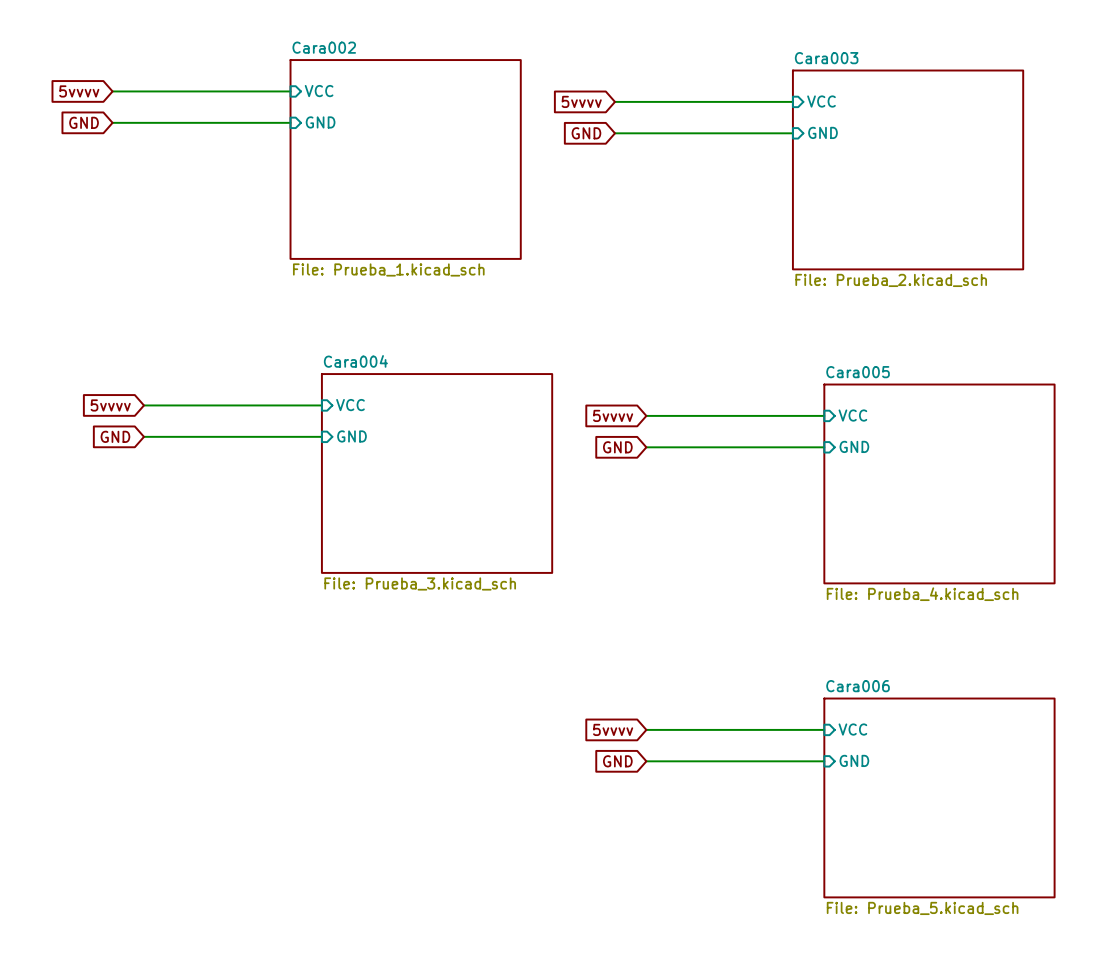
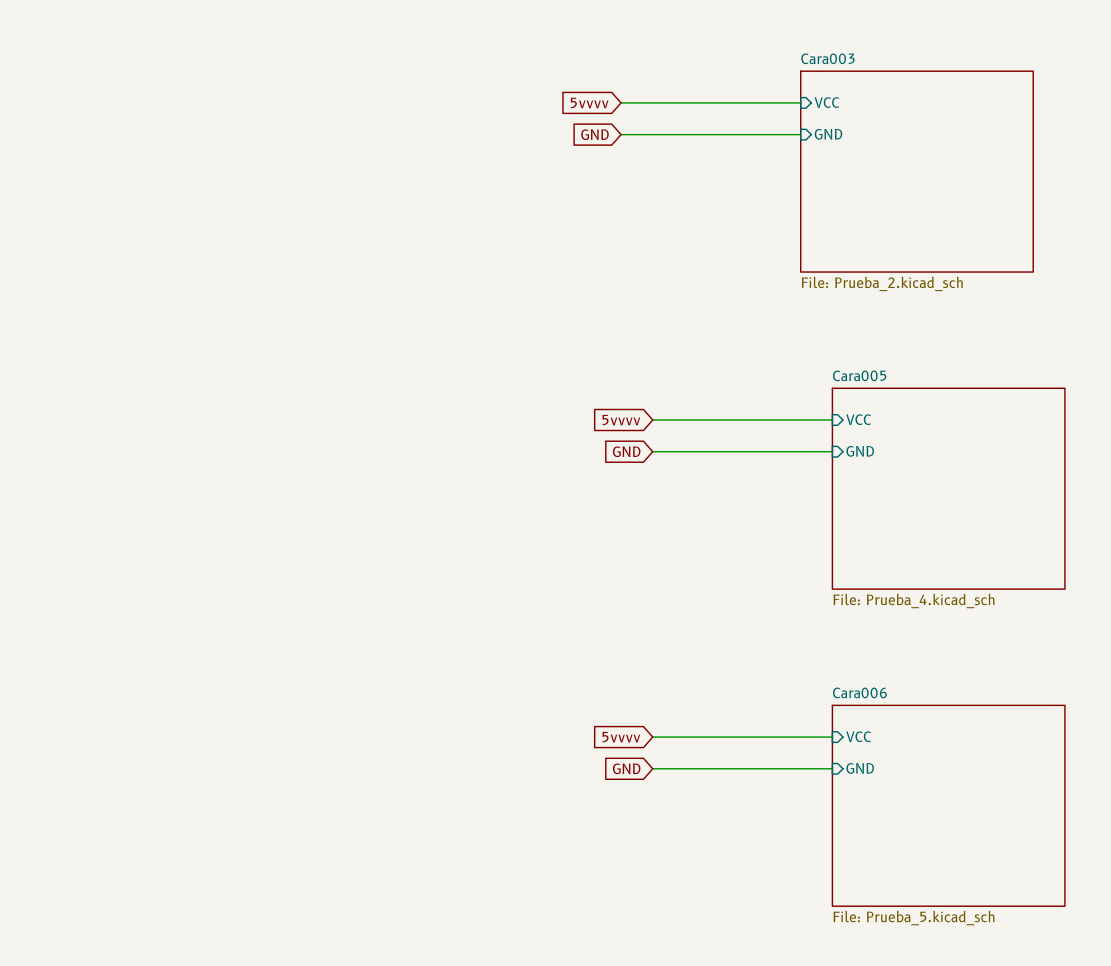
global label: 5vvvv (79, 91) -> none
wire: (112, 91) (290, 91) -> none
sheet pin: VCC (319, 91) -> none
global label: GND (84, 122) -> none
wire: (112, 122) (290, 122) -> none
sheet pin: GND (320, 122) -> none
sheet Cara002: File: Prueba_1.kicad_sch (405, 159) -> none
global label: 5vvvv (110, 405) -> none
wire: (143, 405) (321, 405) -> none
sheet pin: VCC (350, 405) -> none
global label: GND (115, 436) -> none
wire: (143, 436) (321, 436) -> none
sheet pin: GND (351, 436) -> none
sheet Cara004: File: Prueba_3.kicad_sch (437, 473) -> none

